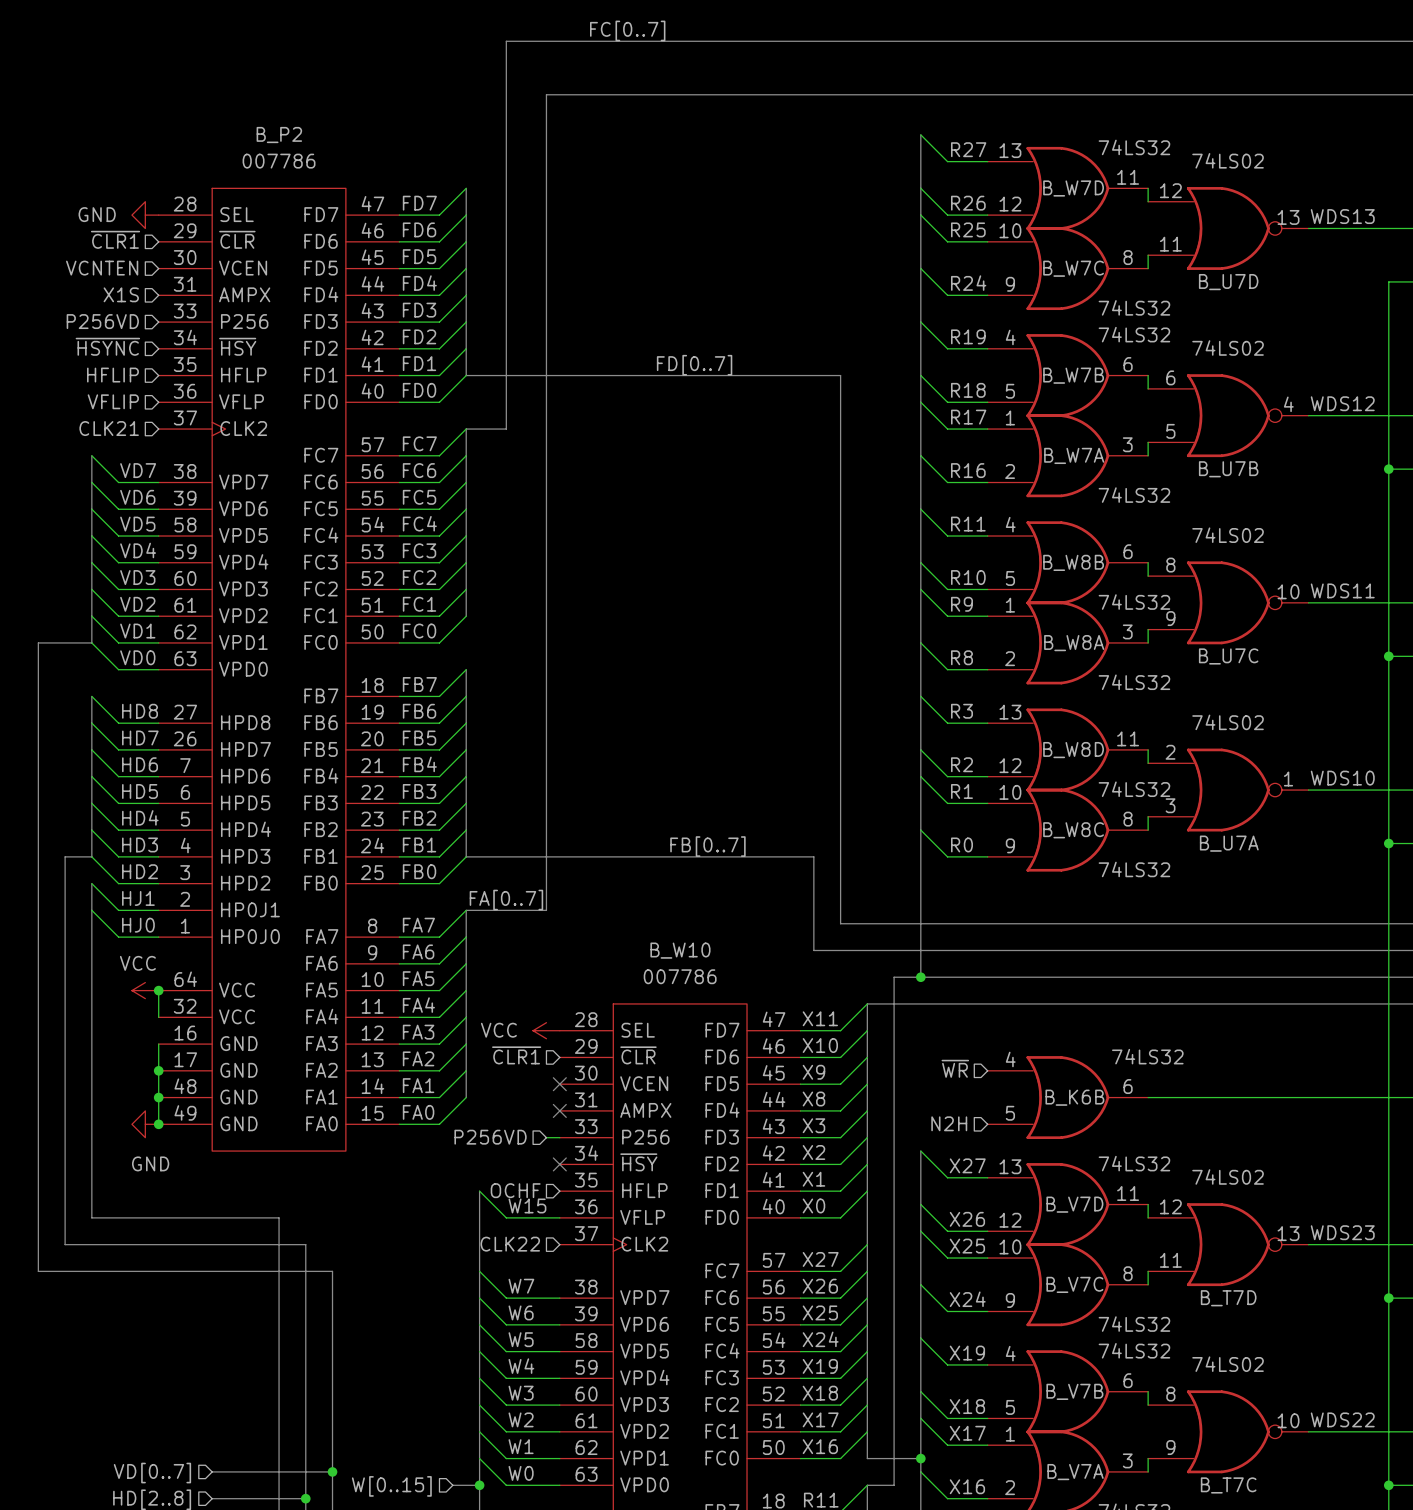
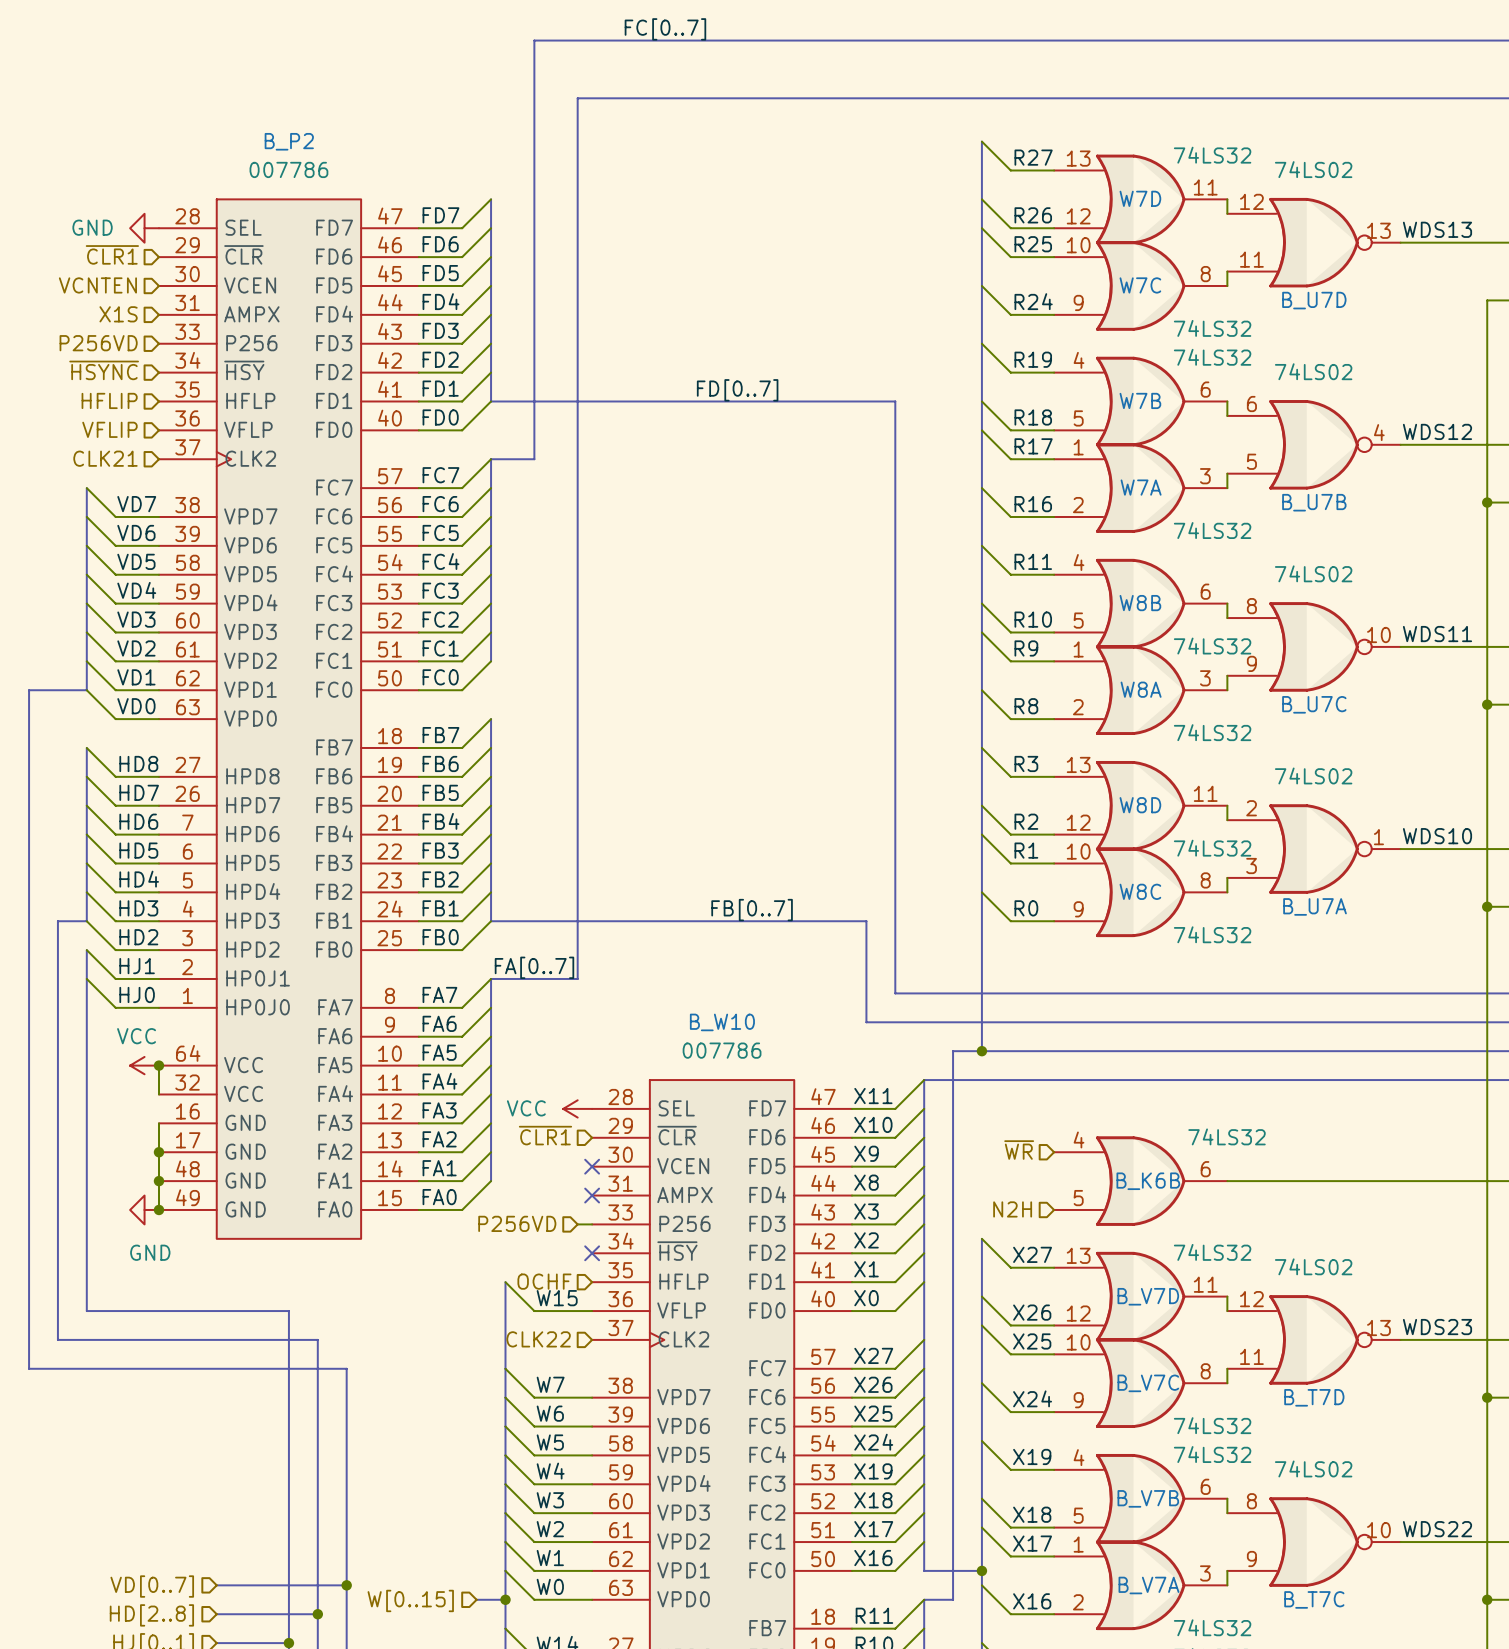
B_W7D name: B_W7D (1073, 188) -> W7D (1140, 198)
B_W7C name: B_W7C (1073, 268) -> W7C (1140, 285)
B_W7B name: B_W7B (1073, 375) -> W7B (1140, 400)
B_W7A name: B_W7A (1074, 455) -> W7A (1141, 487)
B_W8B name: B_W8B (1073, 562) -> W8B (1140, 603)
B_W8A name: B_W8A (1074, 643) -> W8A (1141, 689)
B_W8D name: B_W8D (1073, 750) -> W8D (1140, 805)
B_W8C name: B_W8C (1073, 830) -> W8C (1140, 891)

